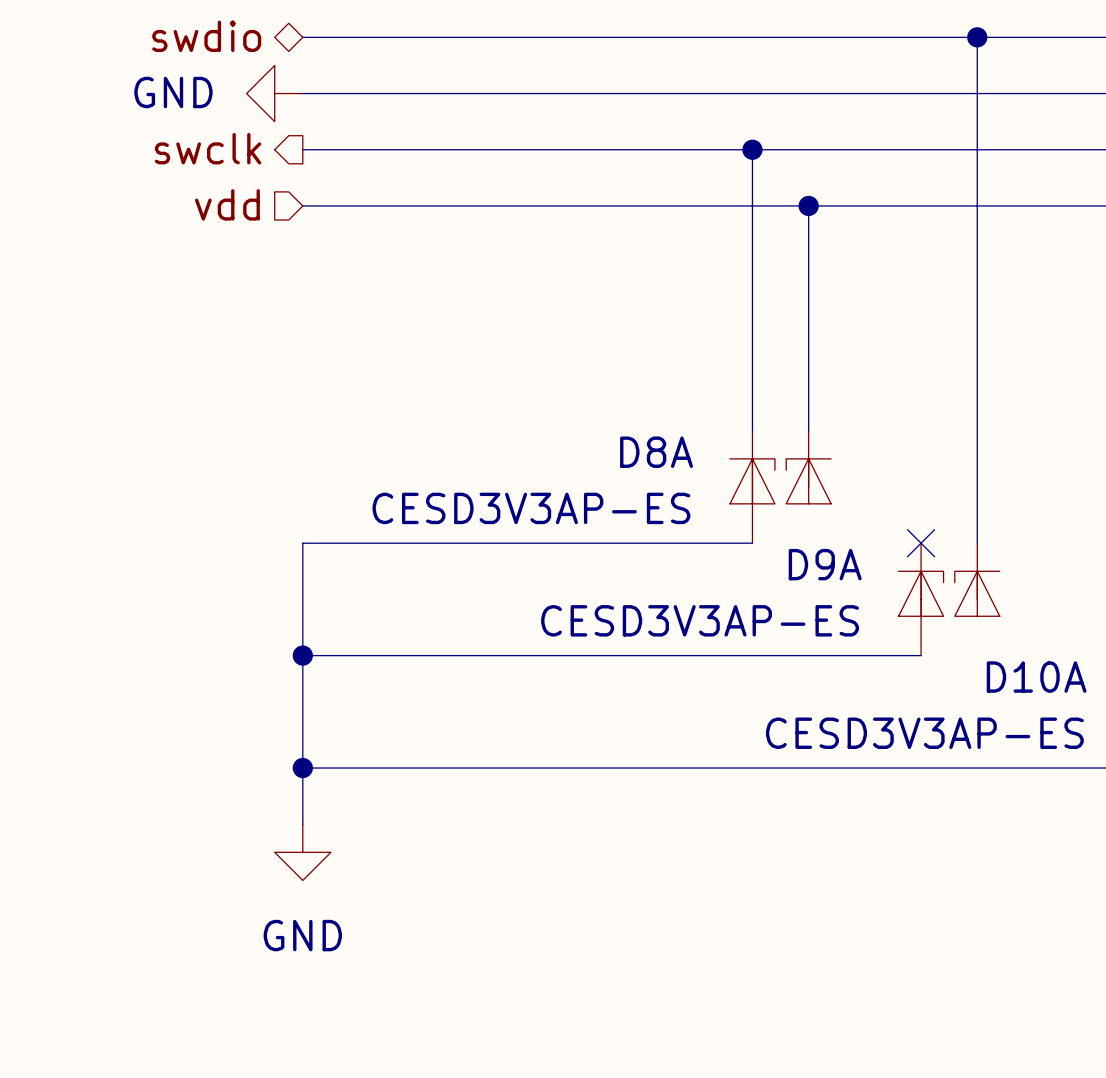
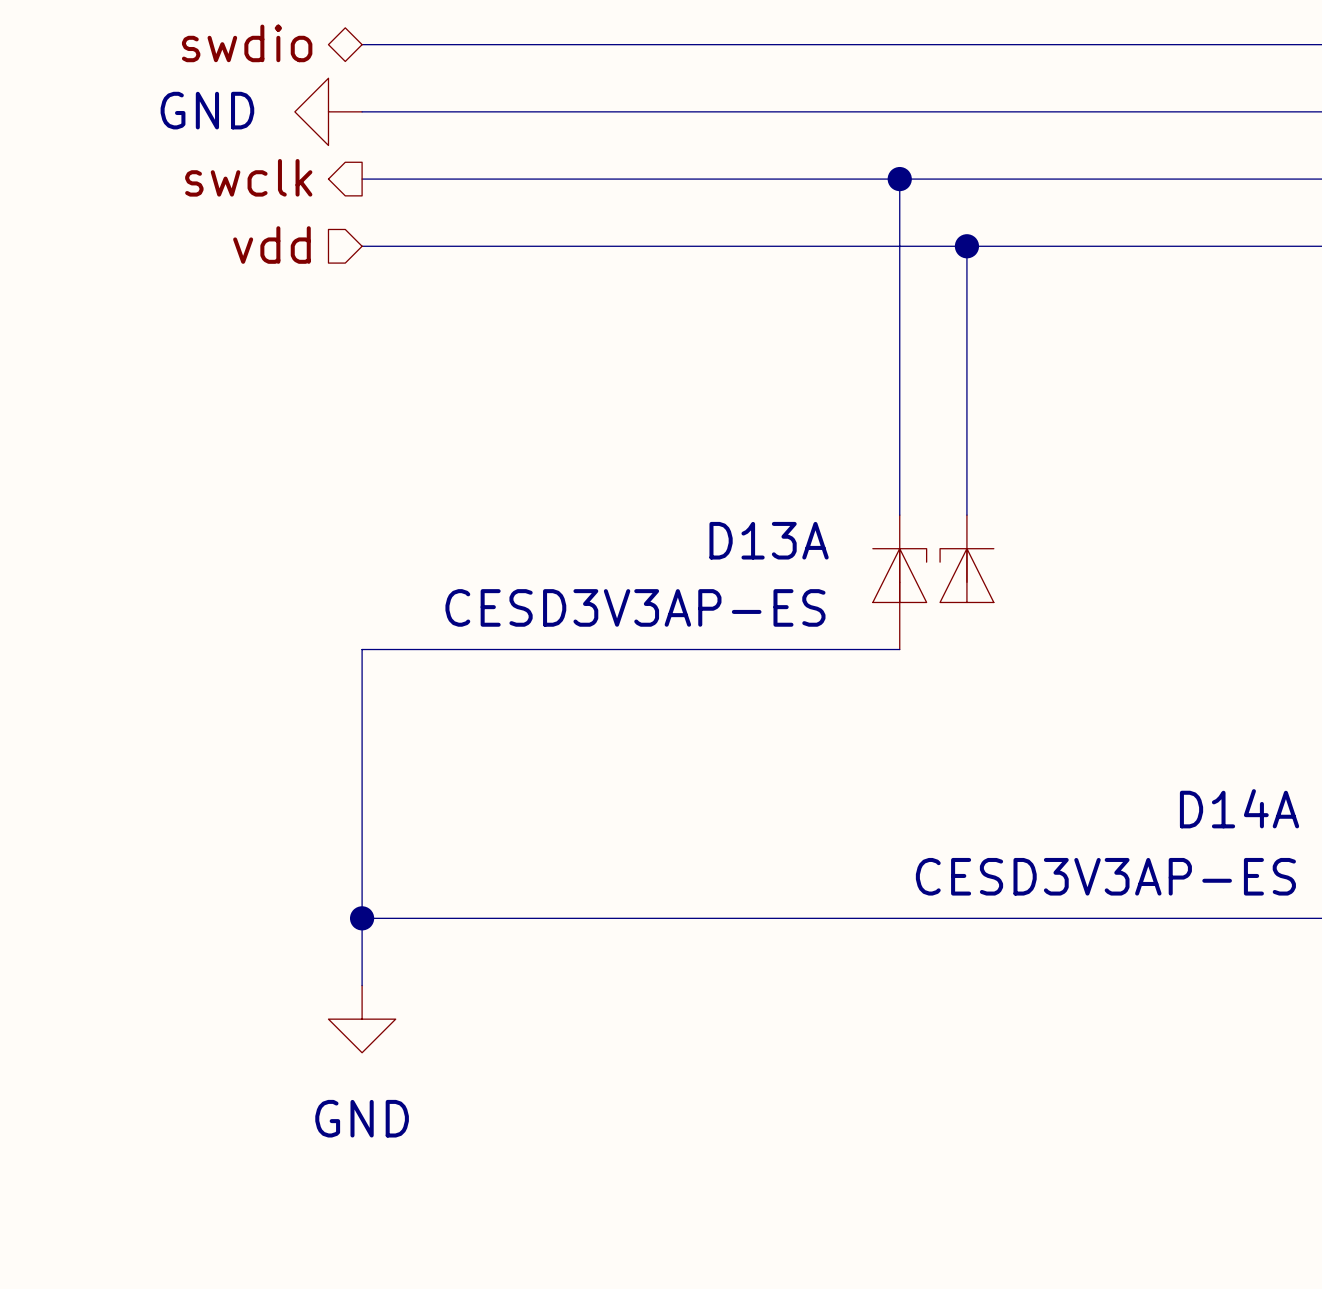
wire: (977, 37) (977, 543) -> none
junction: (977, 37) -> none
D8A name: D8A (656, 452) -> D13A (769, 540)
no-connect mark: (921, 543) -> none
part: (977, 579) -> none
D9A: CESD3V3AP-ES (921, 599) -> none
wire: (302, 655) (921, 655) -> none
junction: (302, 655) -> none
D10A name: D10A (1036, 677) -> D14A (1239, 808)

